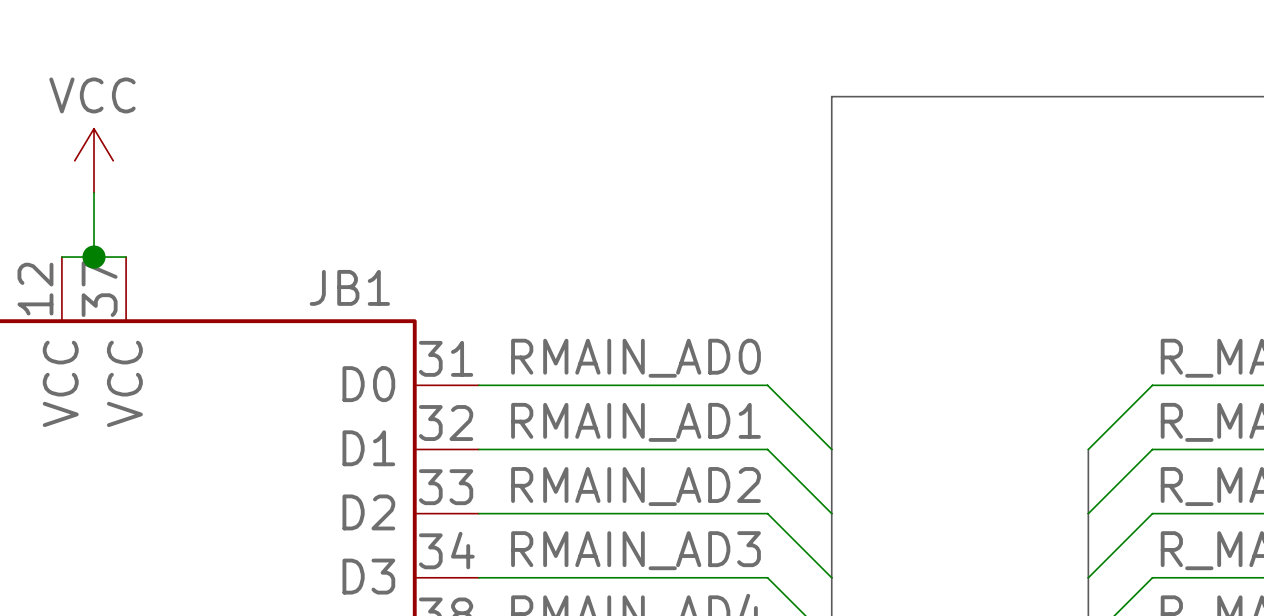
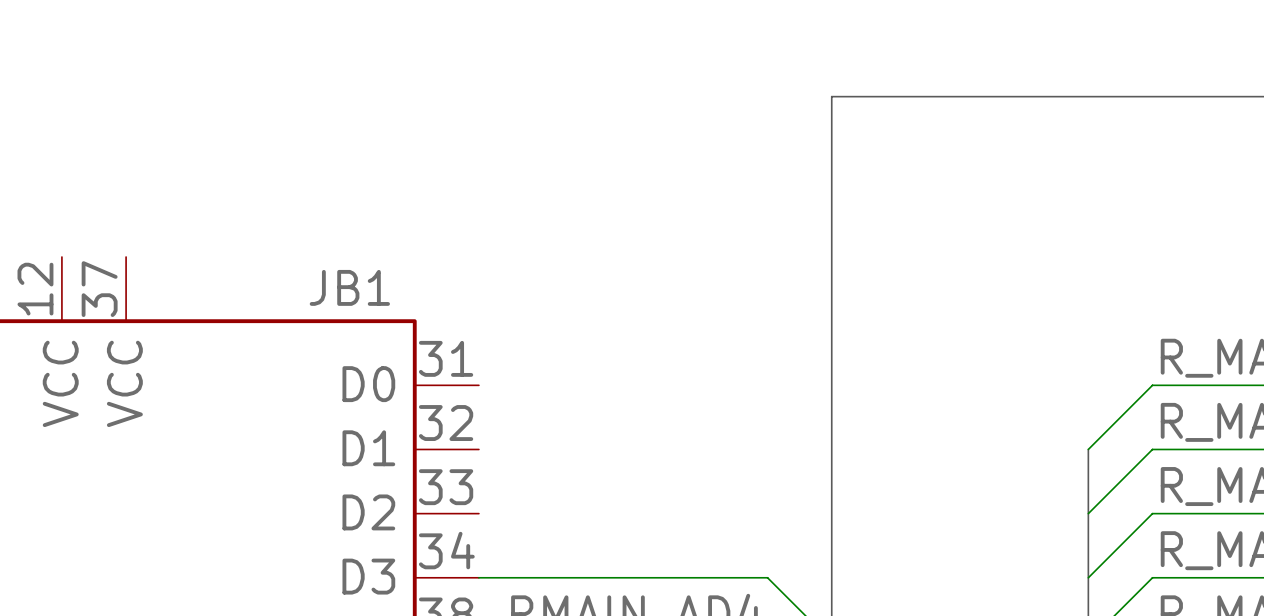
power symbol: VCC (94, 160) -> none
wire: (94, 192) (94, 257) -> none
wire: (61, 257) (126, 257) -> none
junction: (94, 257) -> none
label: RMAIN_AD0 (635, 358) -> none
wire: (478, 385) (767, 385) (831, 449) -> none
label: RMAIN_AD1 (635, 422) -> none
wire: (478, 449) (767, 449) (831, 513) -> none
label: RMAIN_AD2 (635, 486) -> none
wire: (478, 513) (767, 513) (831, 577) -> none
label: RMAIN_AD3 (635, 550) -> none

